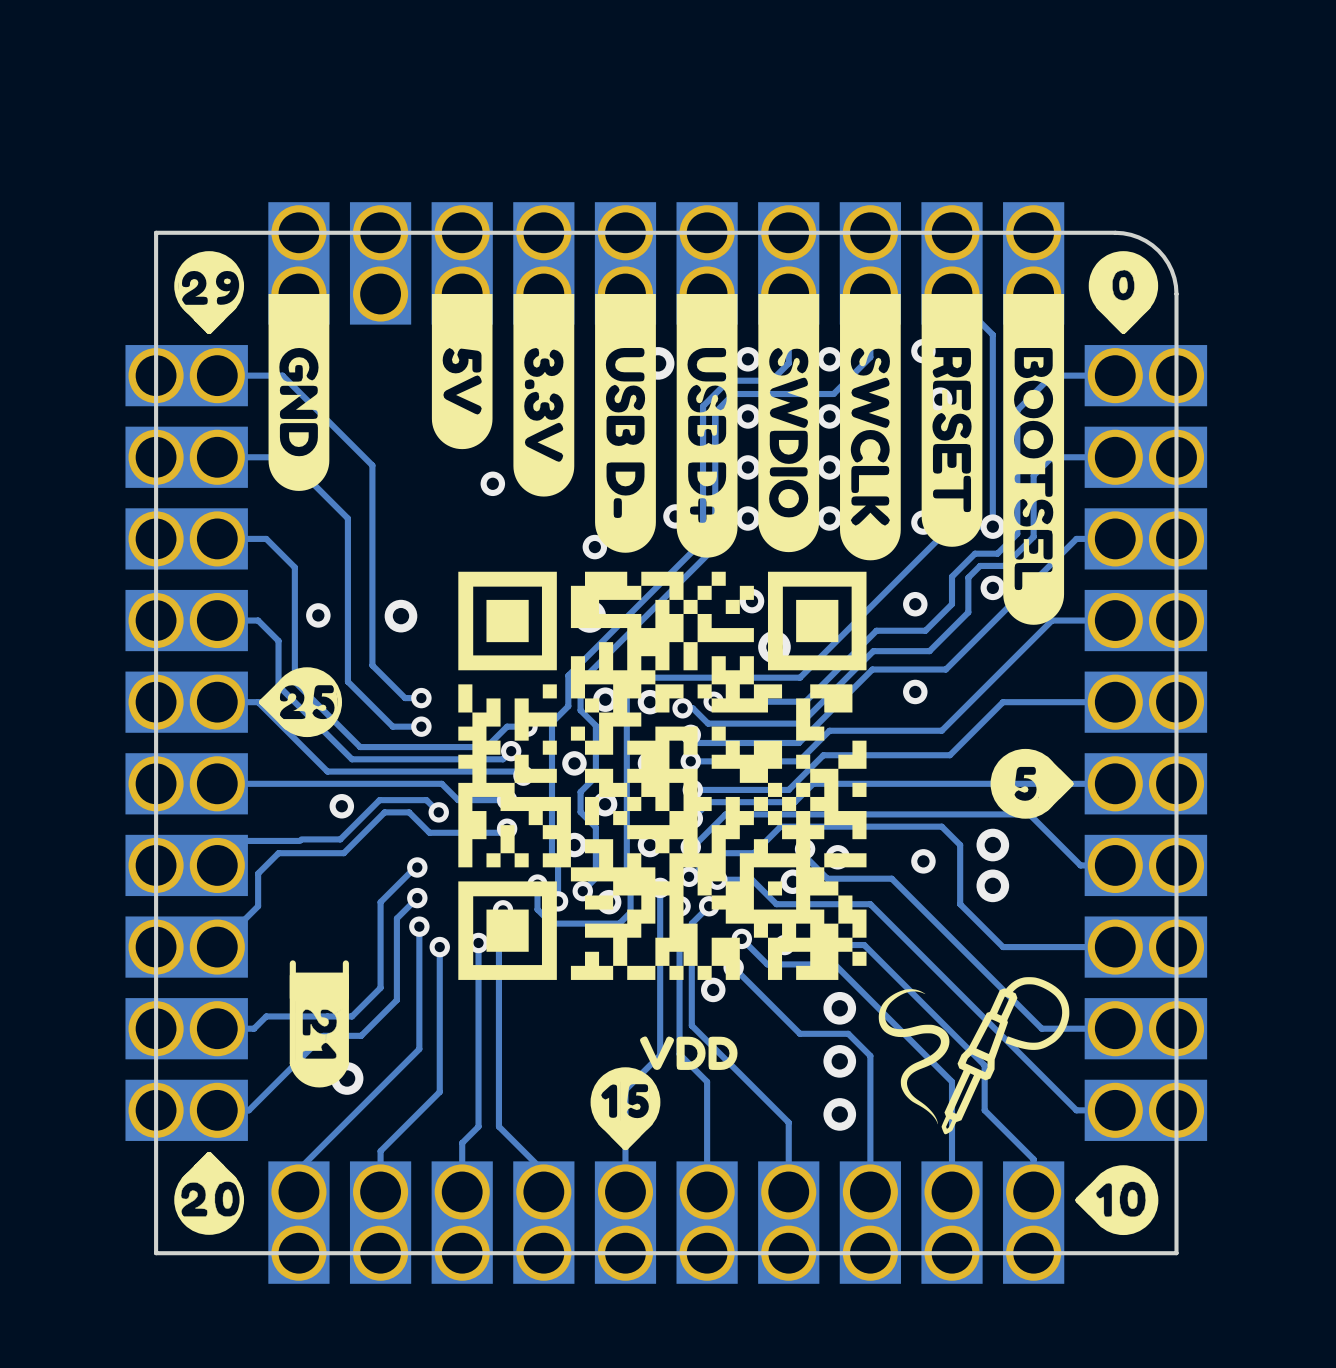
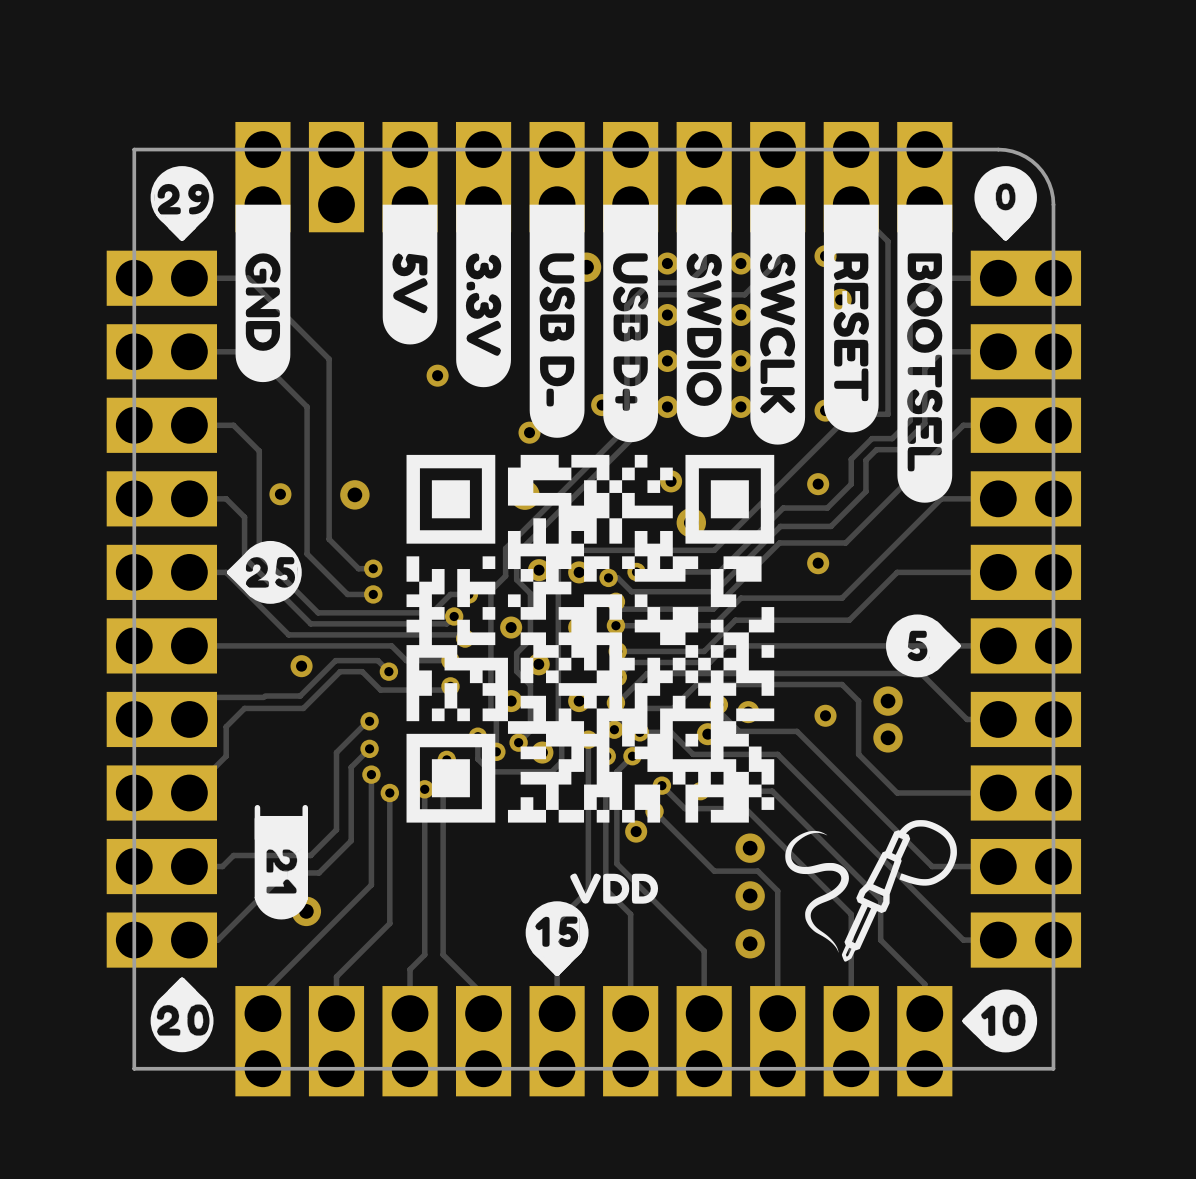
via: (992, 526) -> none
via: (992, 587) -> none

